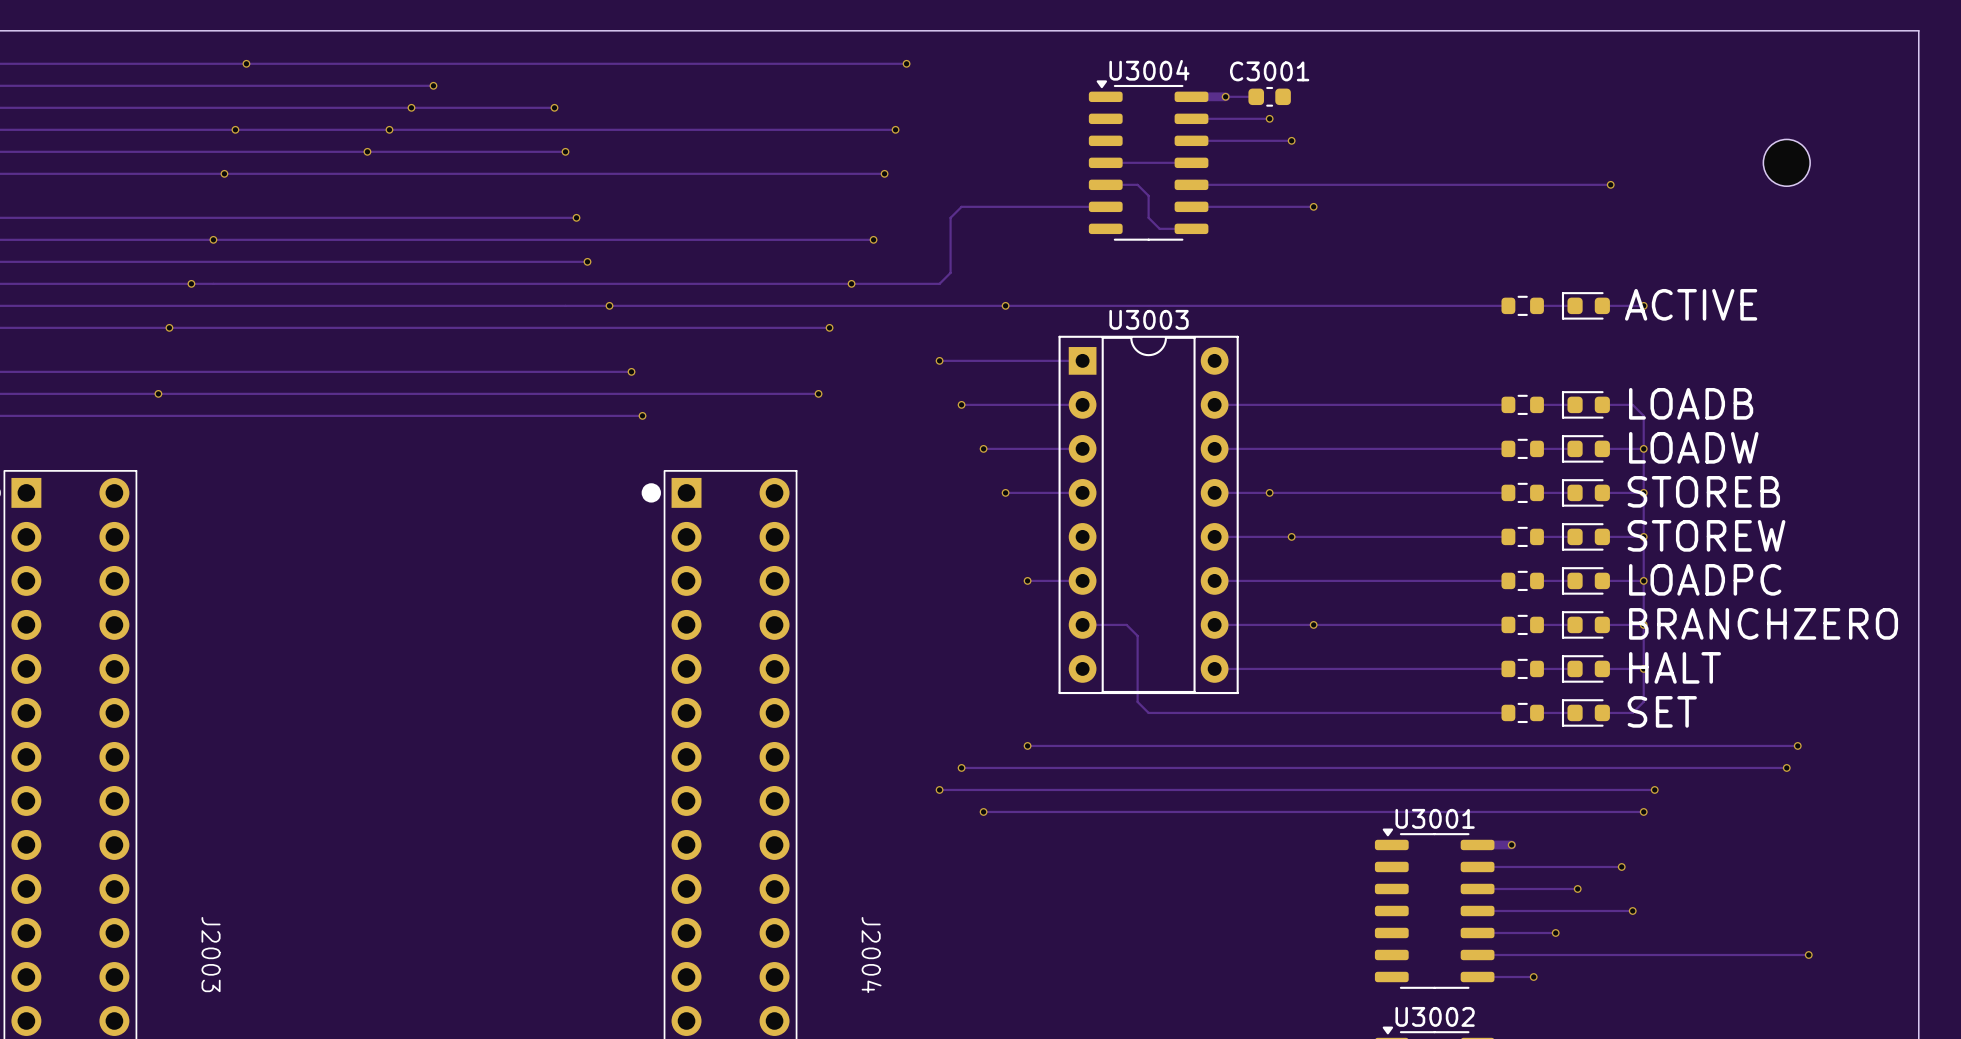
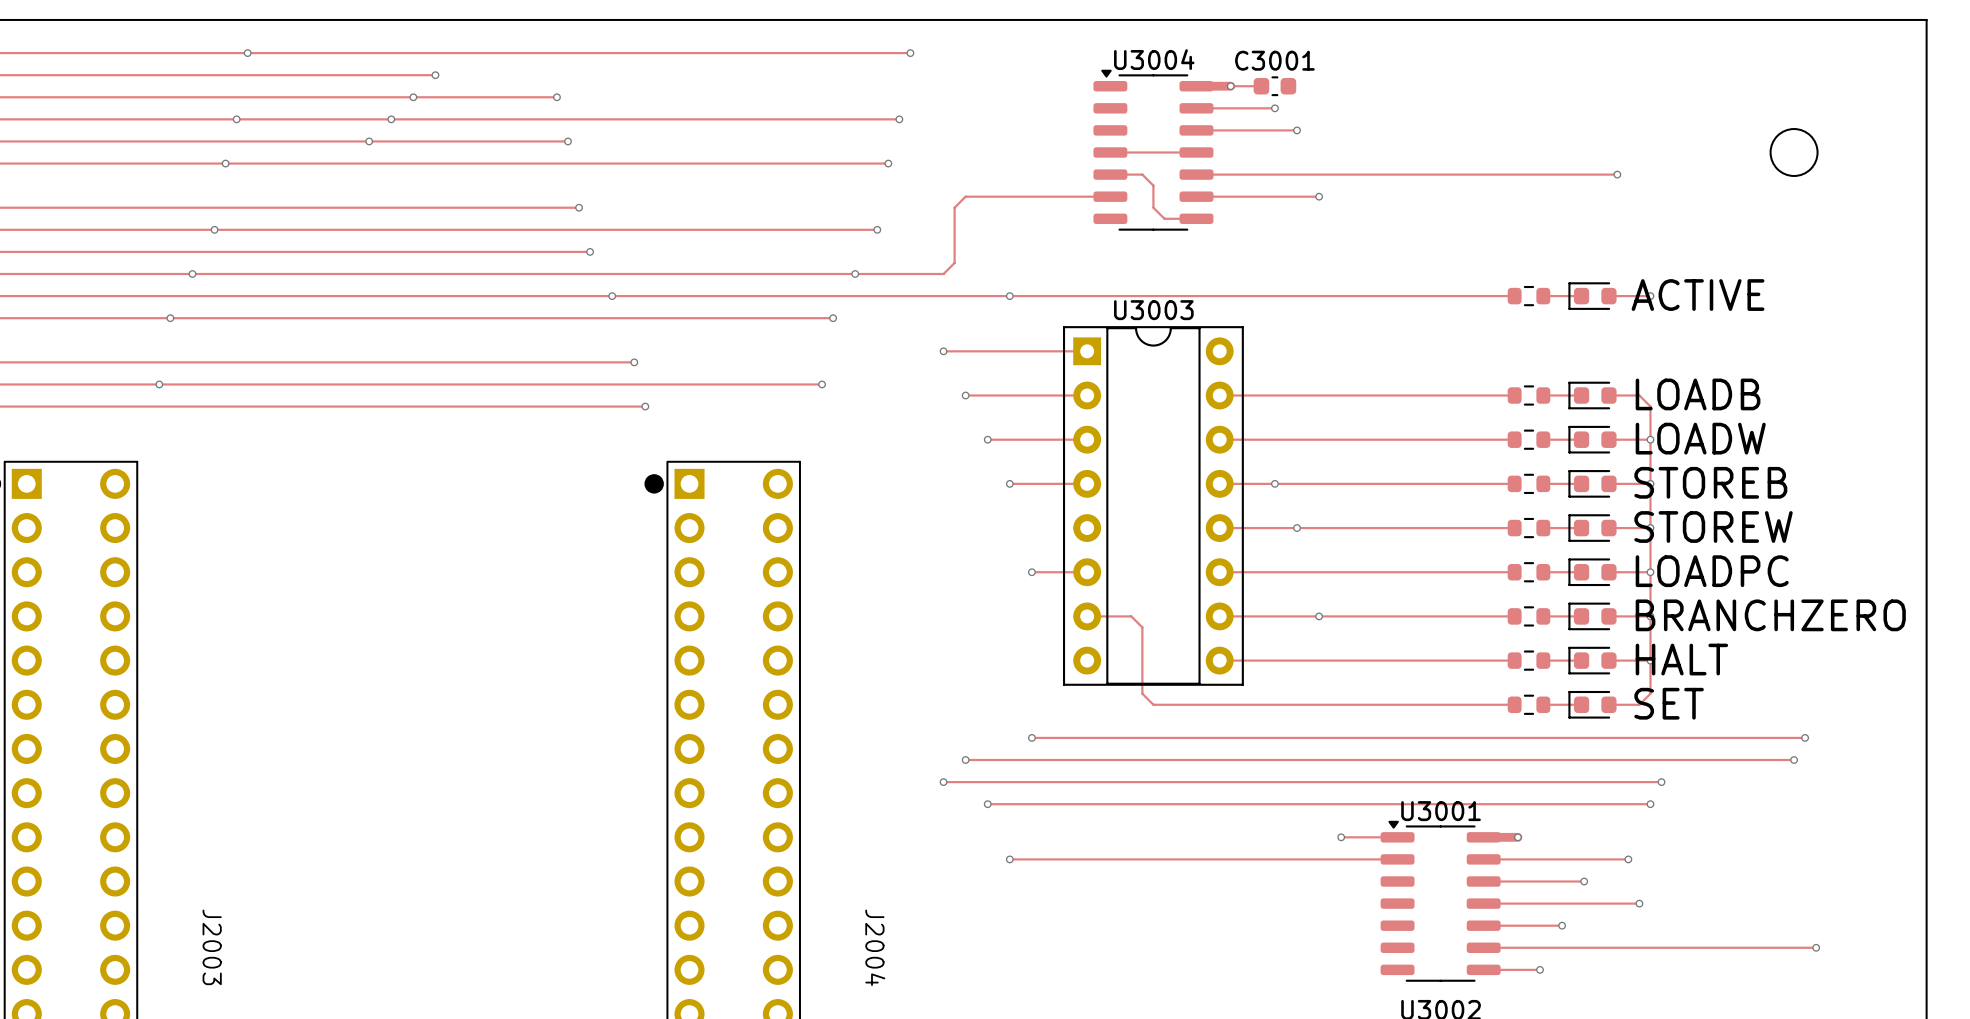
track: none -> (1341, 837) (1397, 837)
via: none -> (1341, 837)
track: none -> (1009, 859) (1397, 859)
via: none -> (1009, 859)

